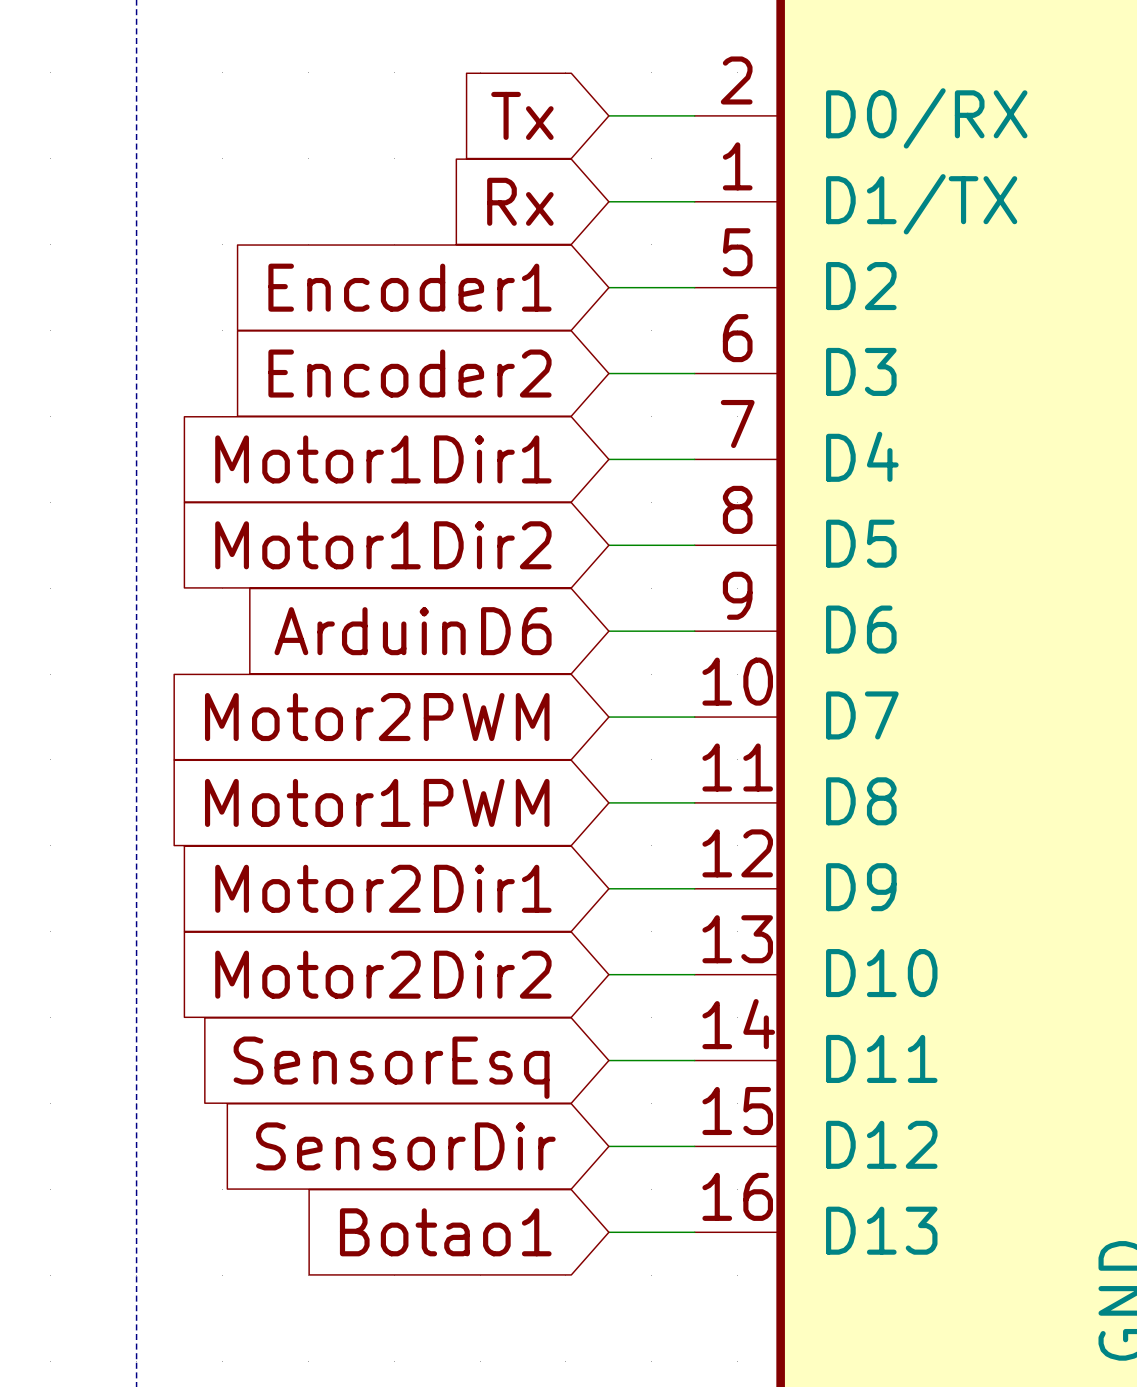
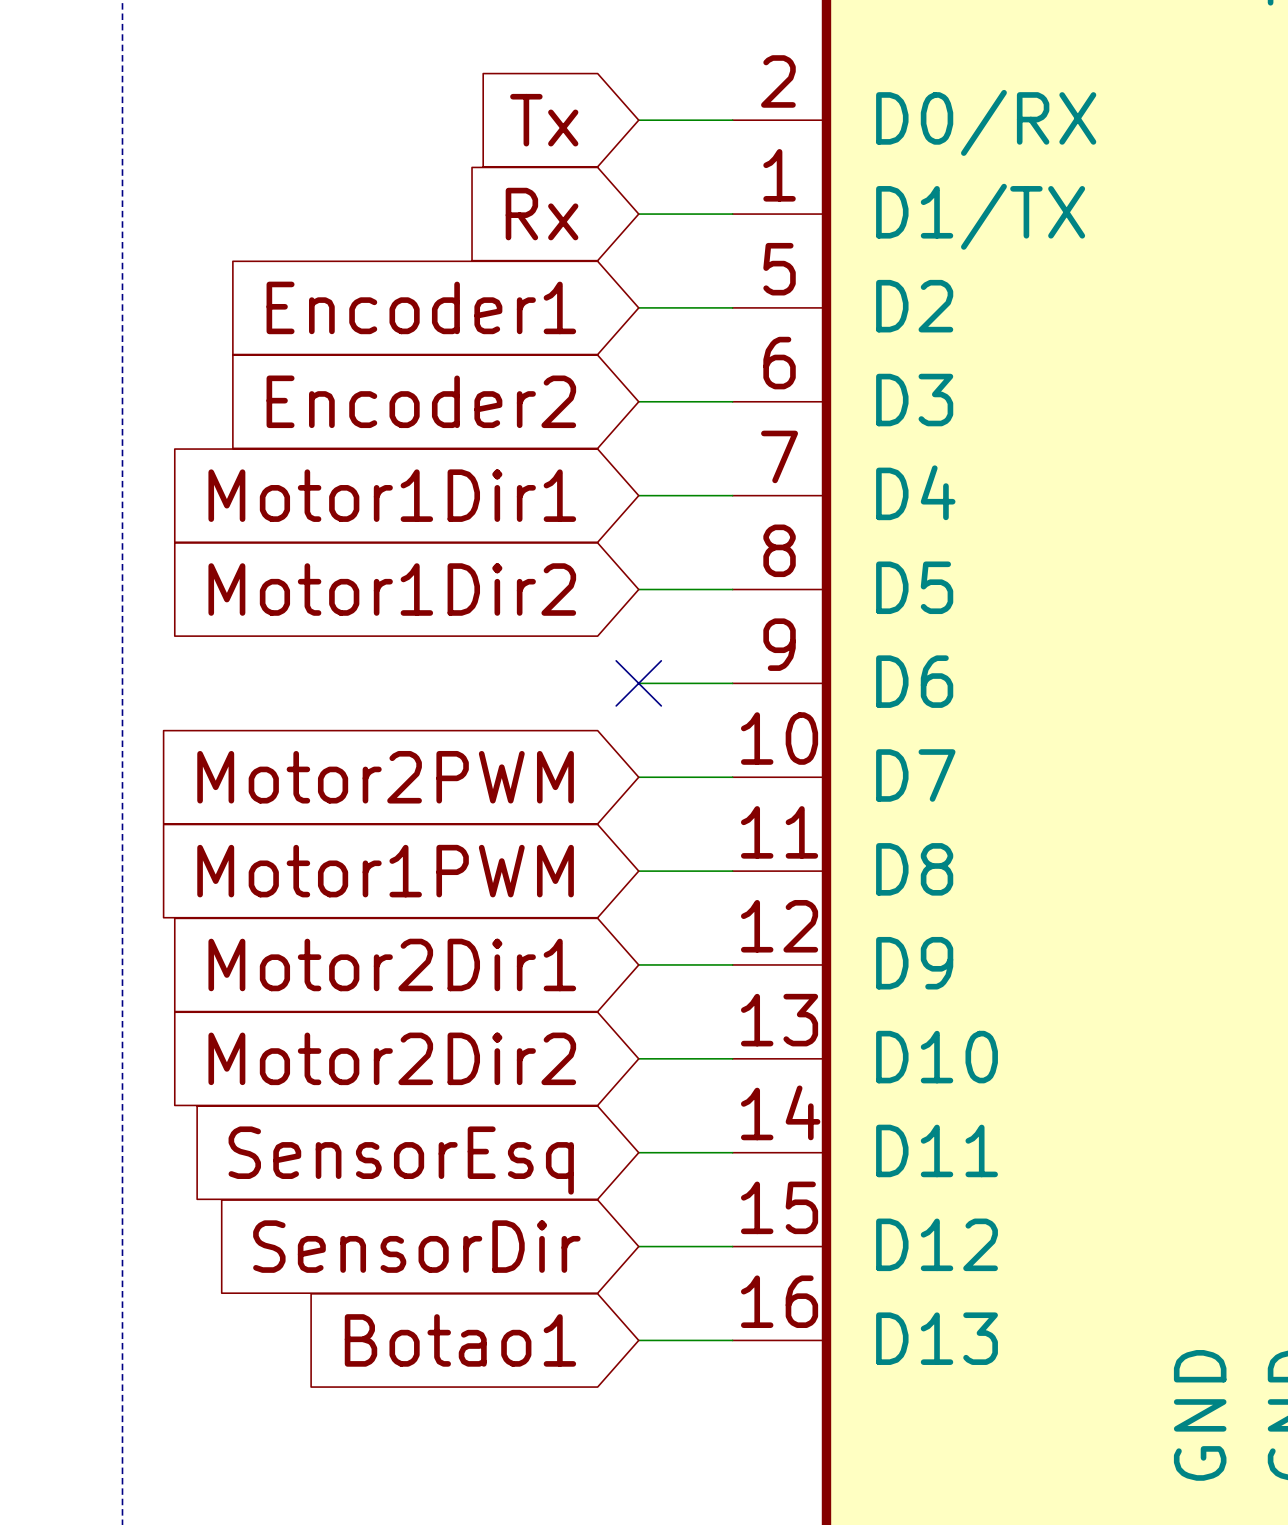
global label: ArduinD6 (413, 631) -> none
no-connect mark: none -> (638, 683)

